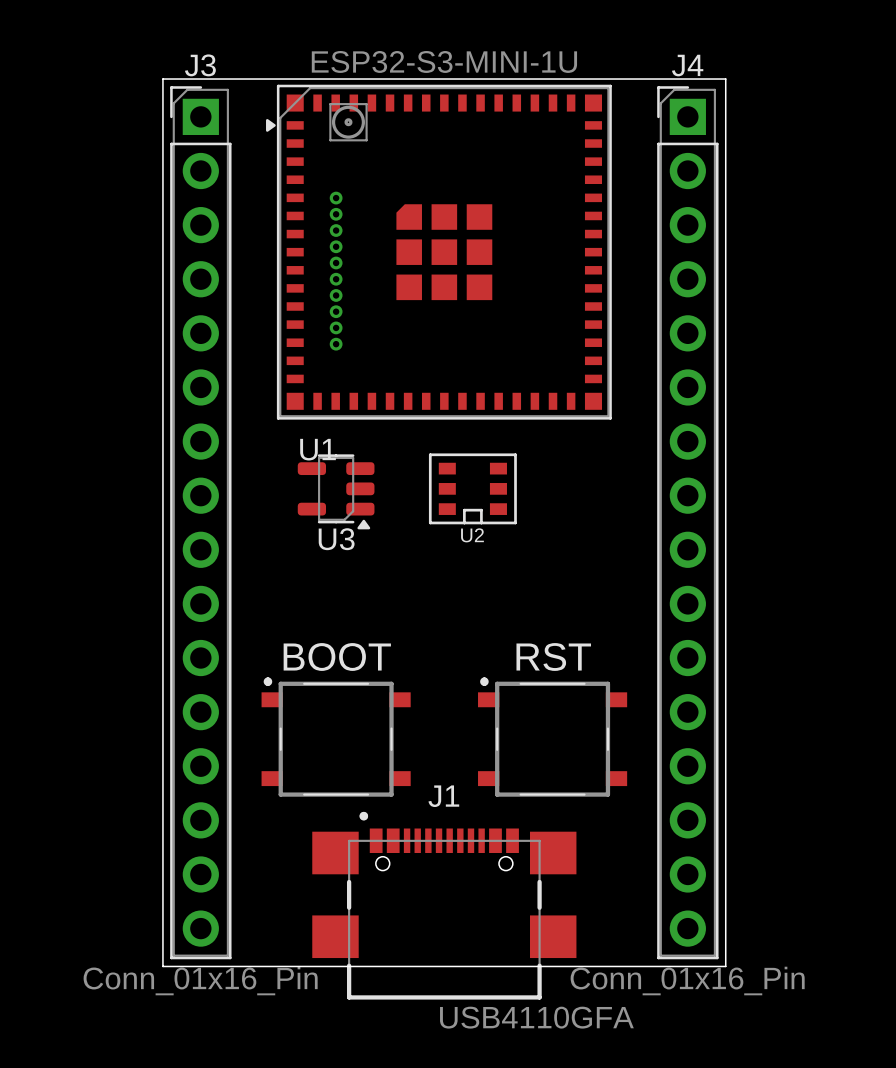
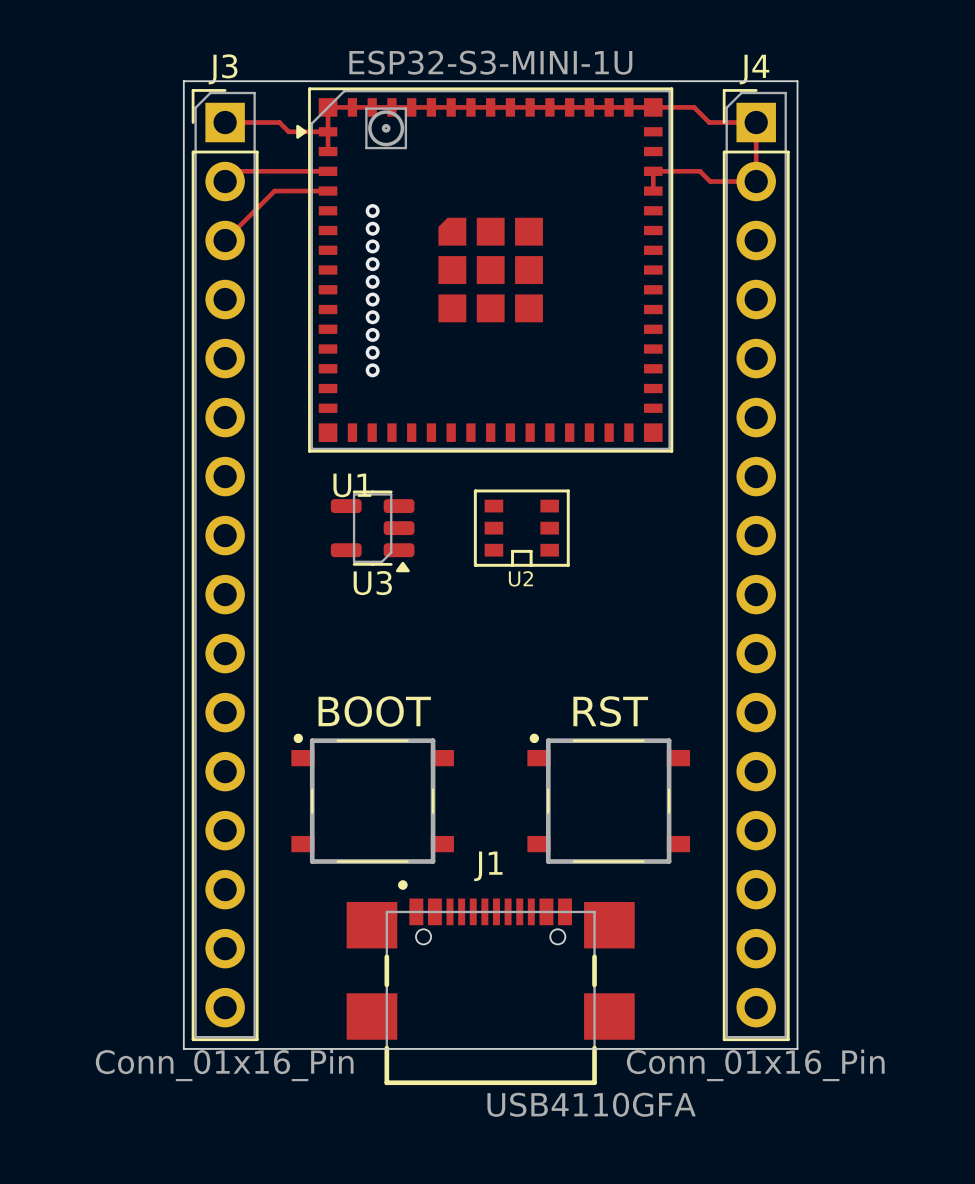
track: none -> (225, 122) (279, 122) (288, 131) (328, 131)
track: none -> (328, 151) (328, 107) (694, 107) (709, 122) (756, 122) (756, 181)
track: none -> (328, 171) (235, 171) (225, 181)
track: none -> (756, 181) (710, 181) (699, 171) (653, 171) (653, 191)
track: none -> (328, 191) (274, 191) (225, 240)

